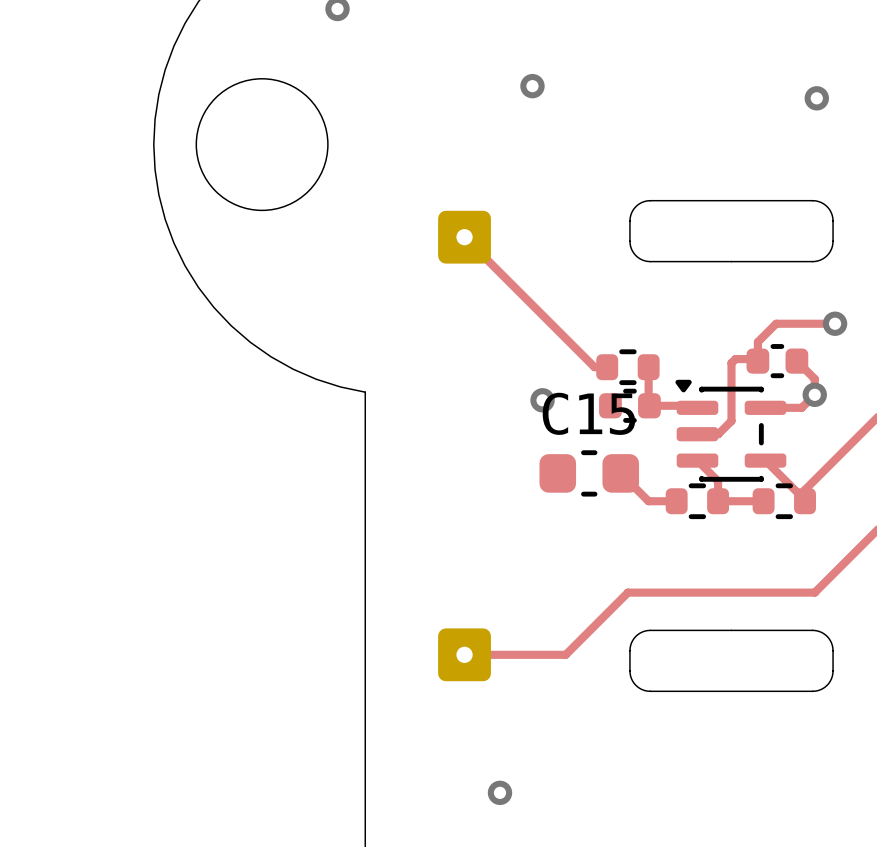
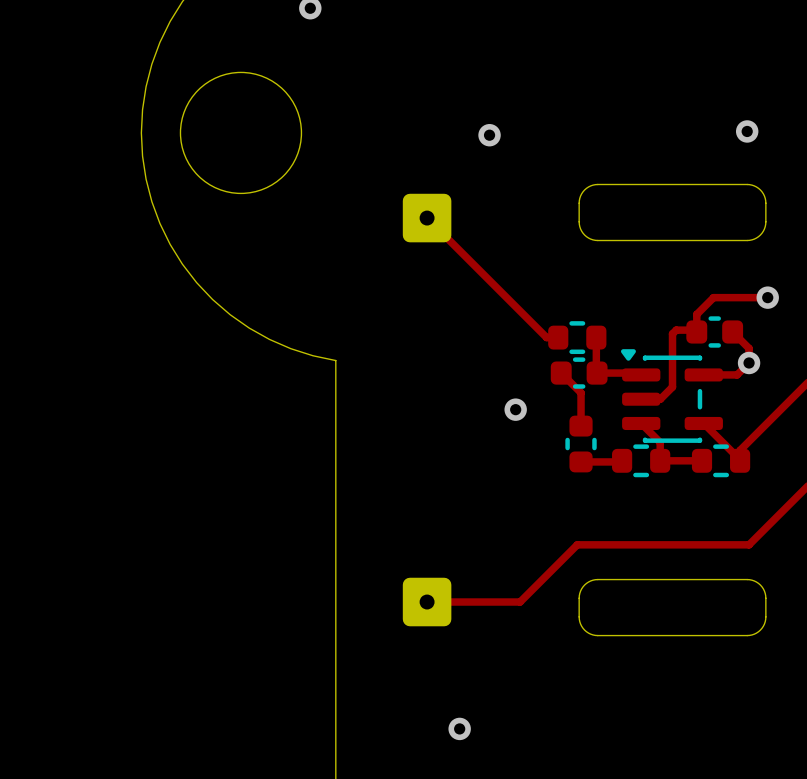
via position: (532, 86) -> (489, 135)
via position: (816, 98) -> (747, 131)
via position: (542, 400) -> (515, 409)
track: none -> (561, 373) (581, 392) (581, 426)
C15: (589, 473) -> none
track: (620, 473) (648, 501) (676, 501) -> none
part: none -> (581, 444)
track: none -> (581, 461) (620, 461)

